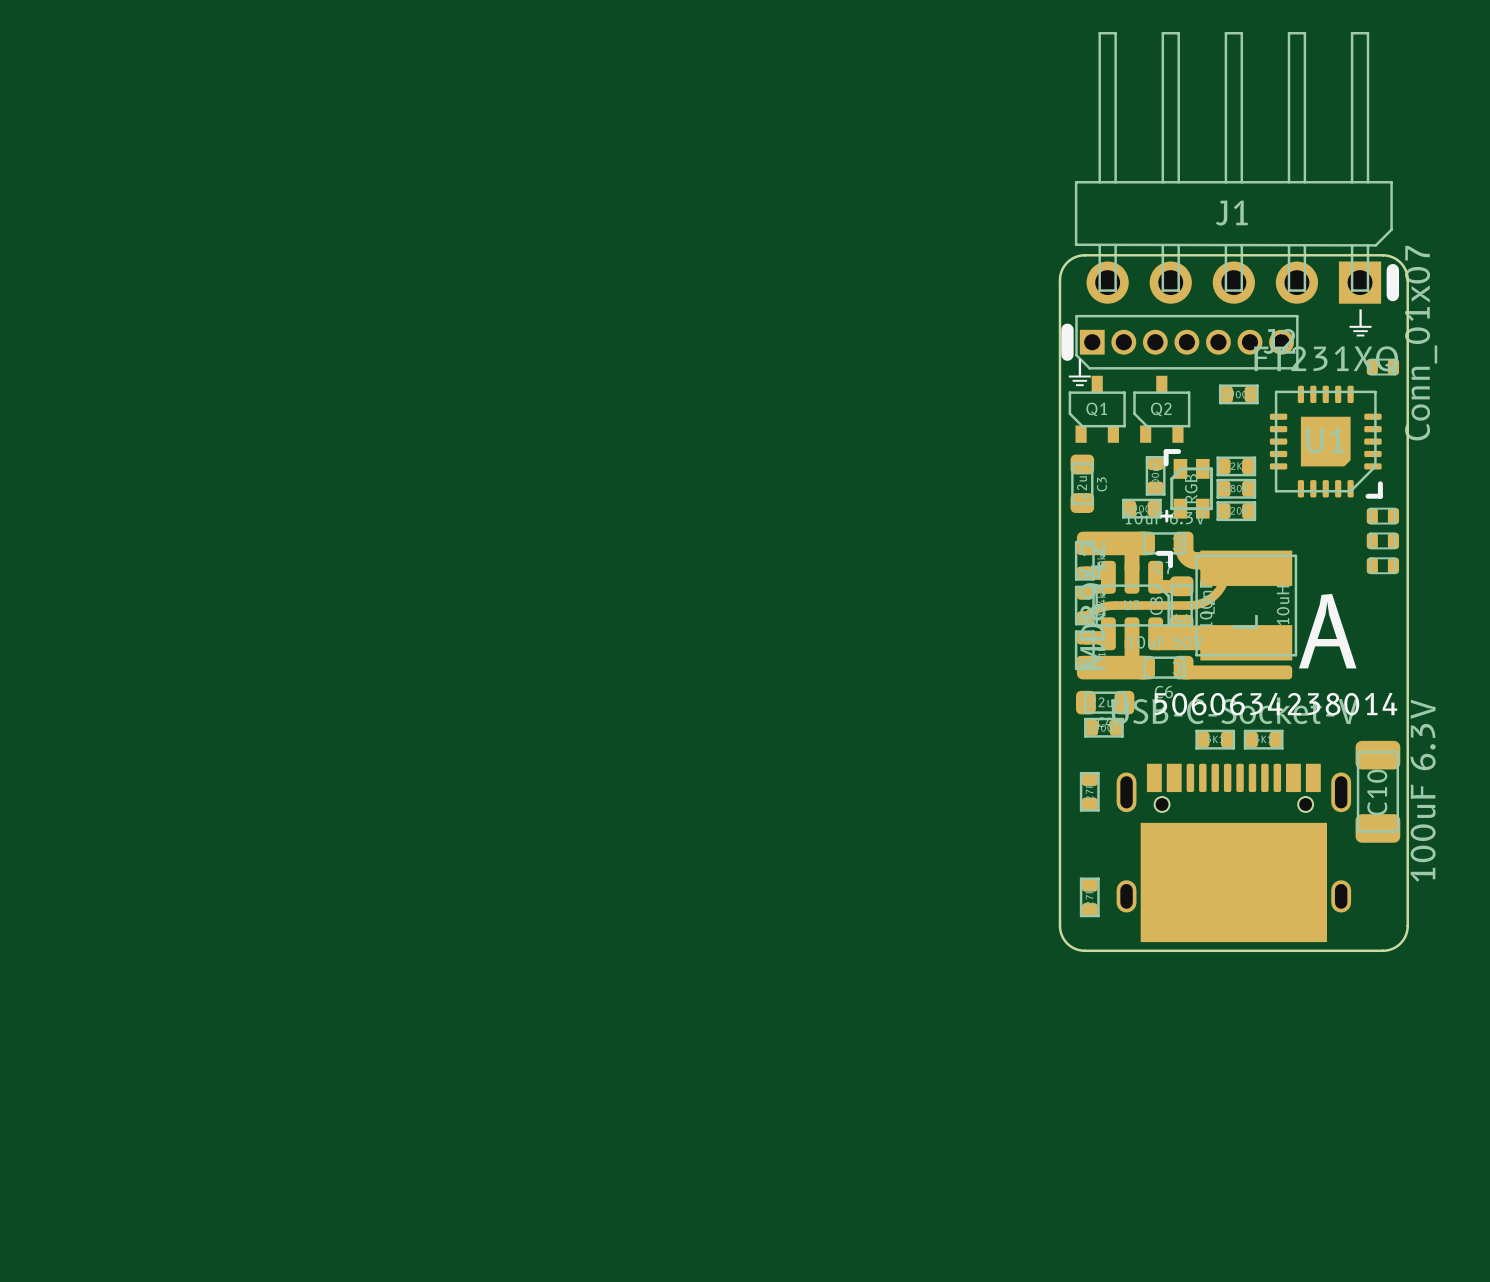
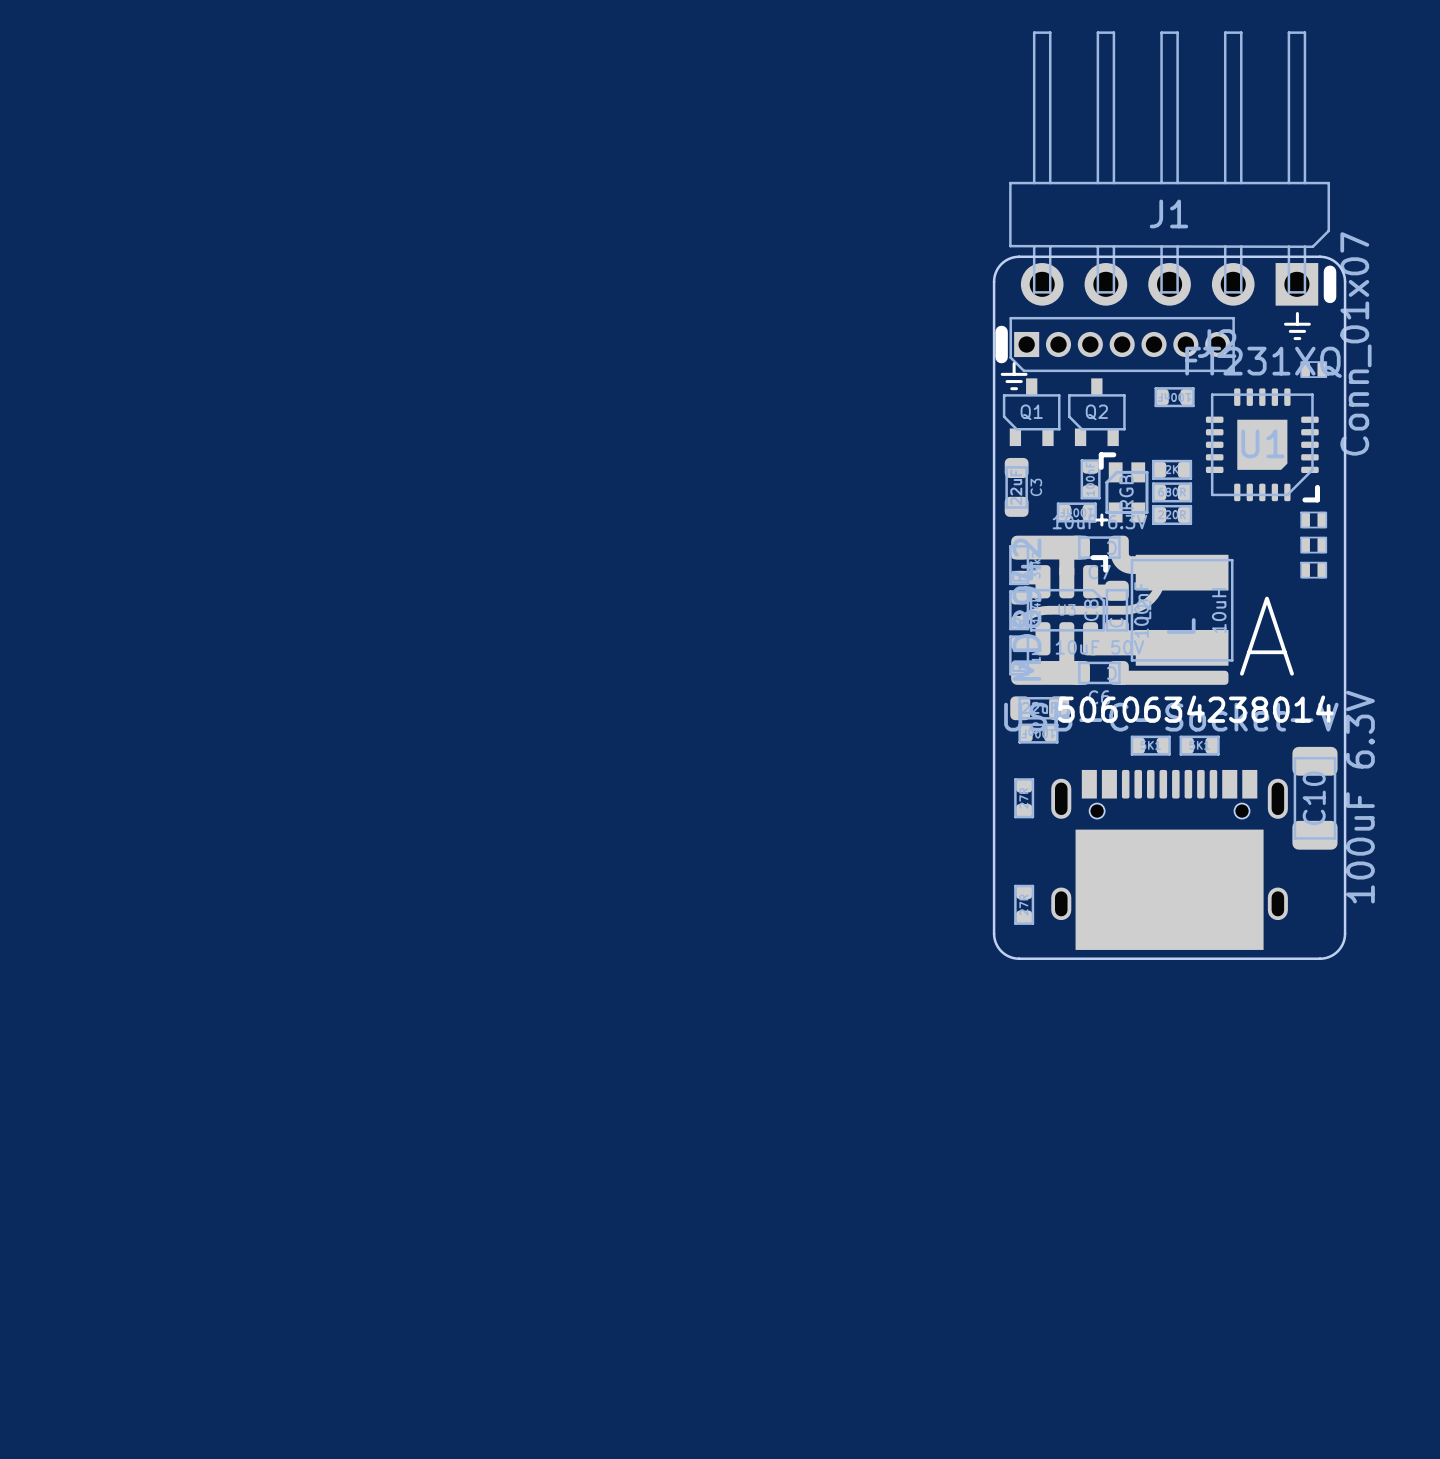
part footprint: [1366, 358, 1400, 376] -> [1300, 361, 1327, 378]
part footprint: [1366, 508, 1400, 525] -> [1300, 511, 1327, 529]
part footprint: [1366, 532, 1400, 550] -> [1300, 536, 1327, 554]
part footprint: [1366, 557, 1400, 574] -> [1300, 561, 1327, 579]

